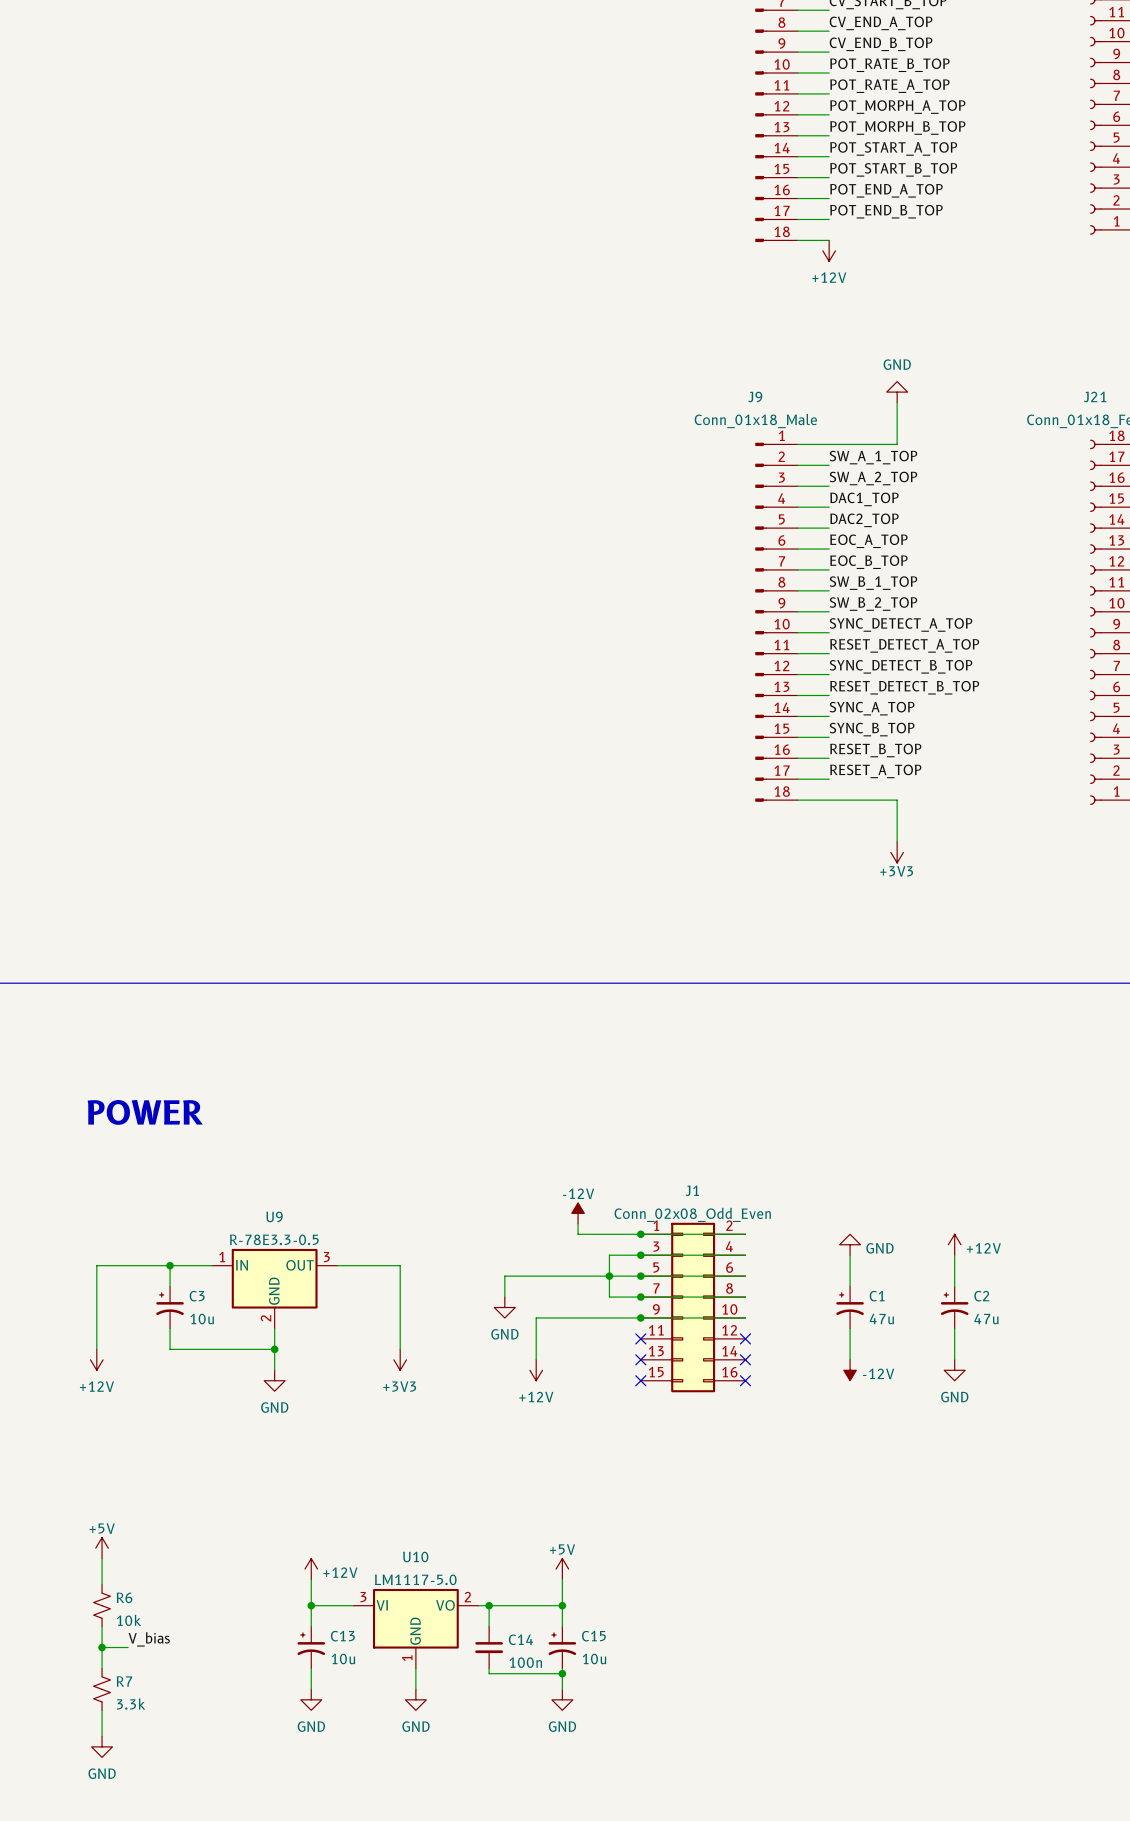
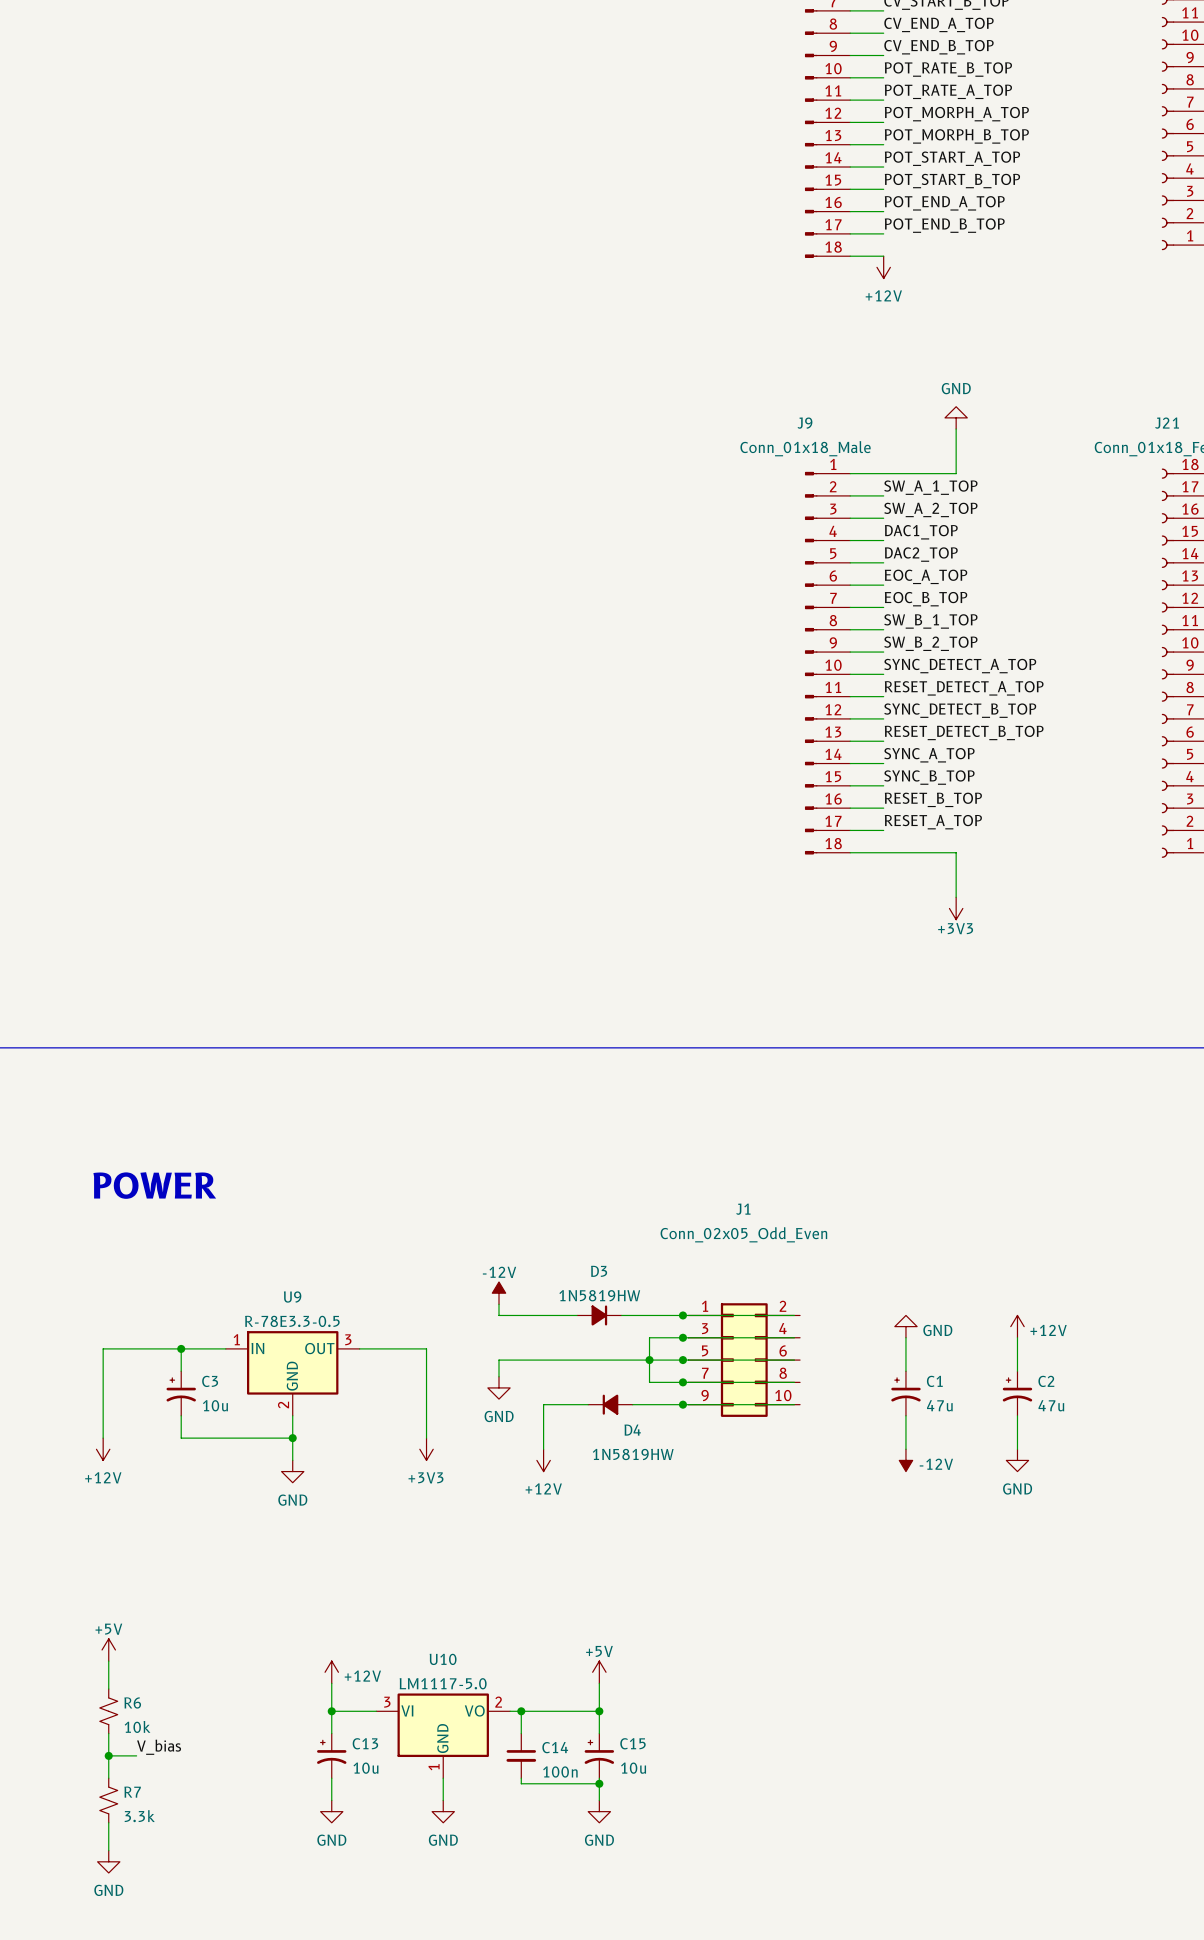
J1 name position: J1 (692, 1190) -> J1 (743, 1209)
power symbol position: -12V (578, 1213) -> -12V (498, 1293)
J1 value: Conn_02x08_Odd_Even (692, 1214) -> Conn_02x05_Odd_Even (743, 1234)
J1 symbol: [640, 1222, 746, 1393] -> [688, 1303, 801, 1417]
wire: none -> (498, 1304) (498, 1315) (577, 1315)
wire: (578, 1223) (578, 1234) (583, 1234) -> none
D3: none -> 1N5819HW (599, 1315)
wire: (504, 1276) (504, 1297) -> (538, 1360) (498, 1360) (498, 1376)
power symbol position: GND (504, 1307) -> GND (498, 1387)
wire: (536, 1317) (536, 1359) -> (571, 1404) (543, 1404) (543, 1449)
D4: none -> 1N5819HW (610, 1404)
no-connect mark: (640, 1338) -> none
no-connect mark: (745, 1338) -> none
no-connect mark: (640, 1359) -> none
no-connect mark: (745, 1359) -> none
power symbol position: +12V (536, 1370) -> +12V (543, 1460)
no-connect mark: (640, 1380) -> none
no-connect mark: (745, 1380) -> none

